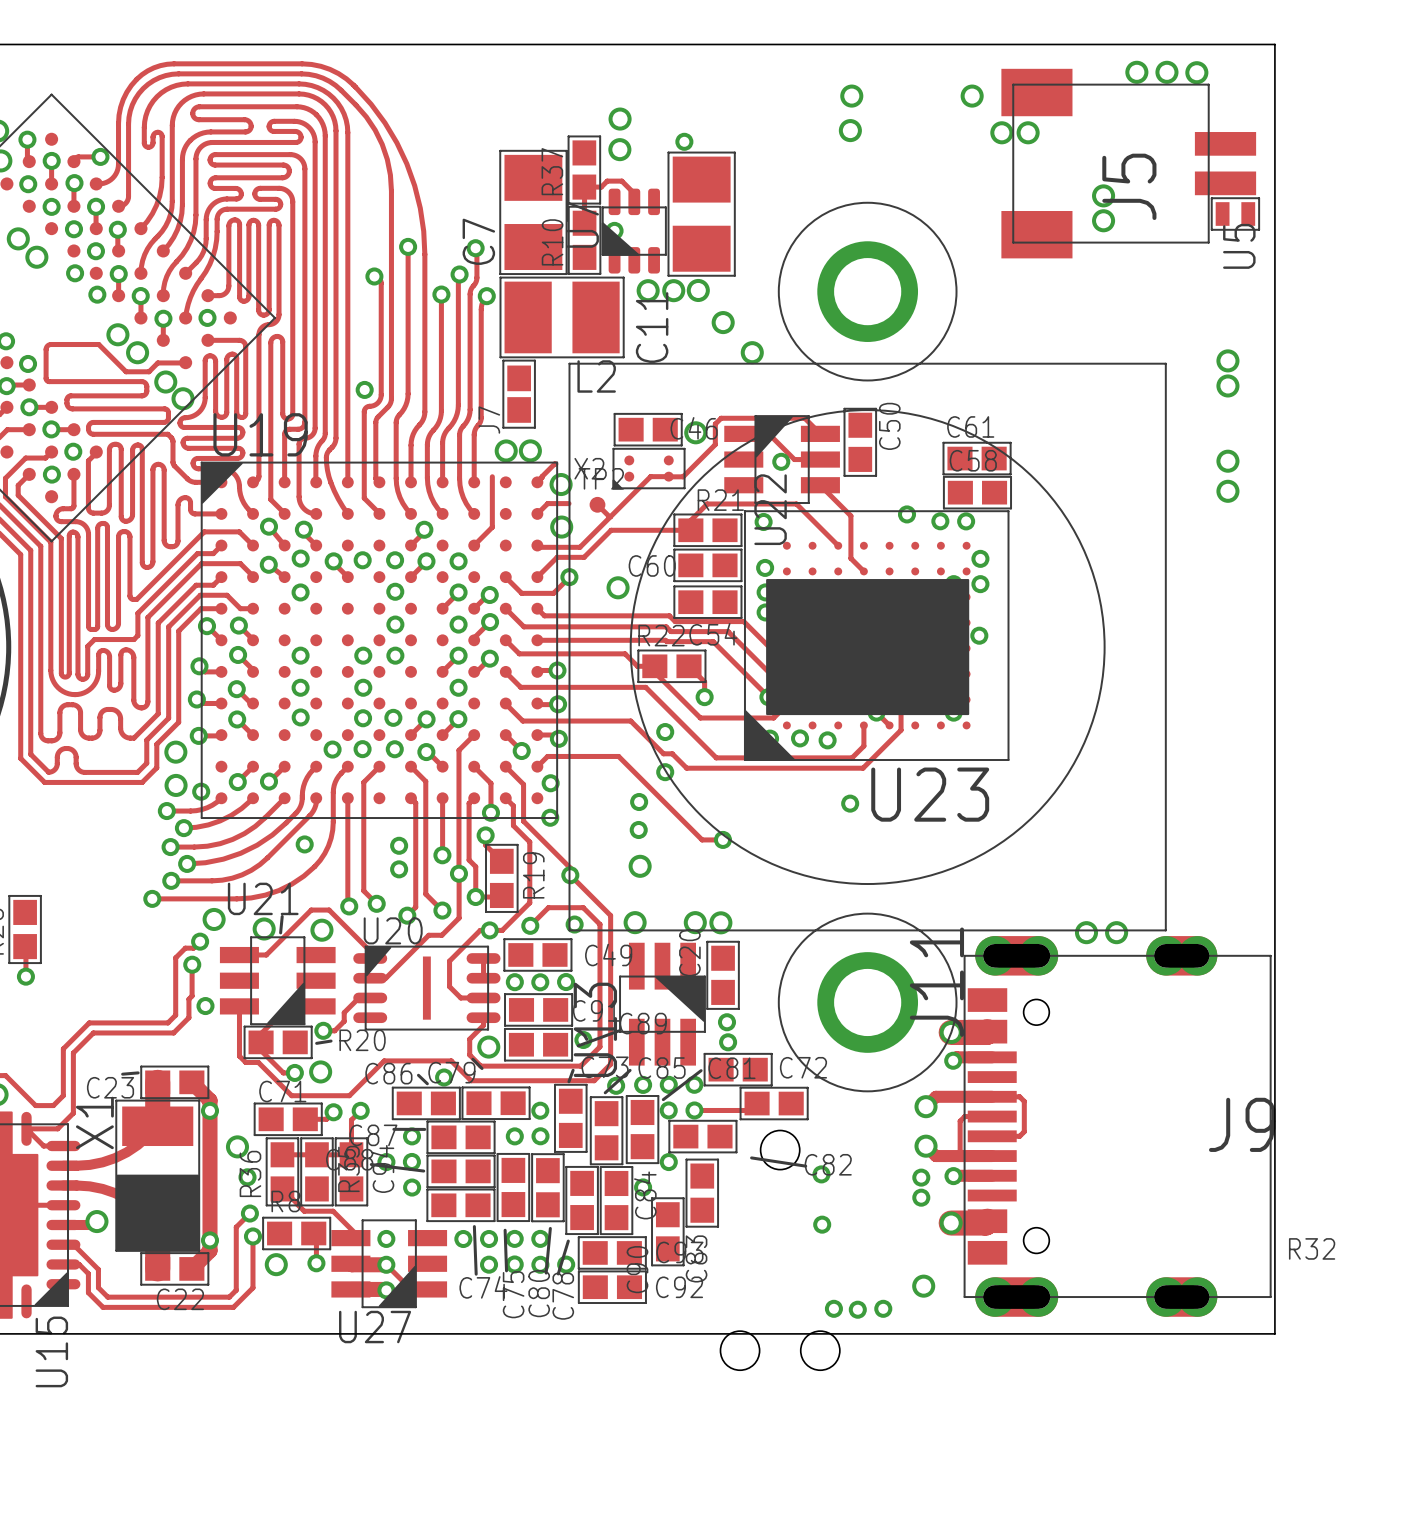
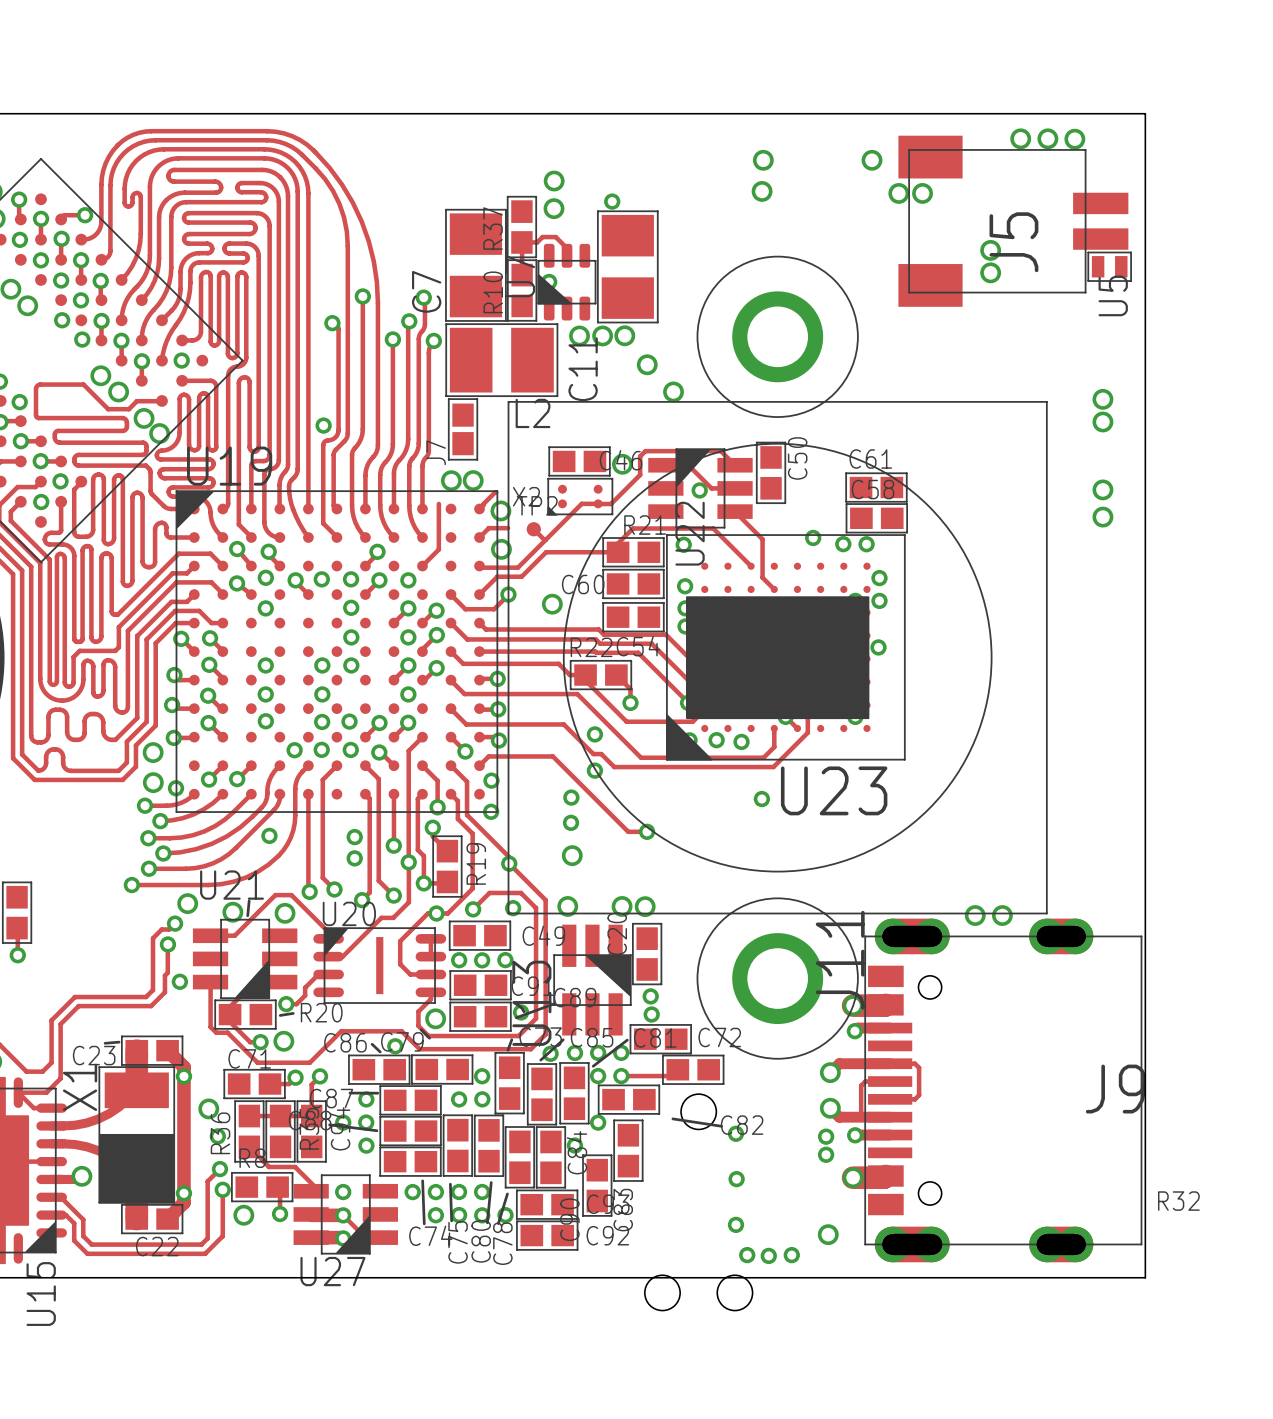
via: none -> (736, 1224)

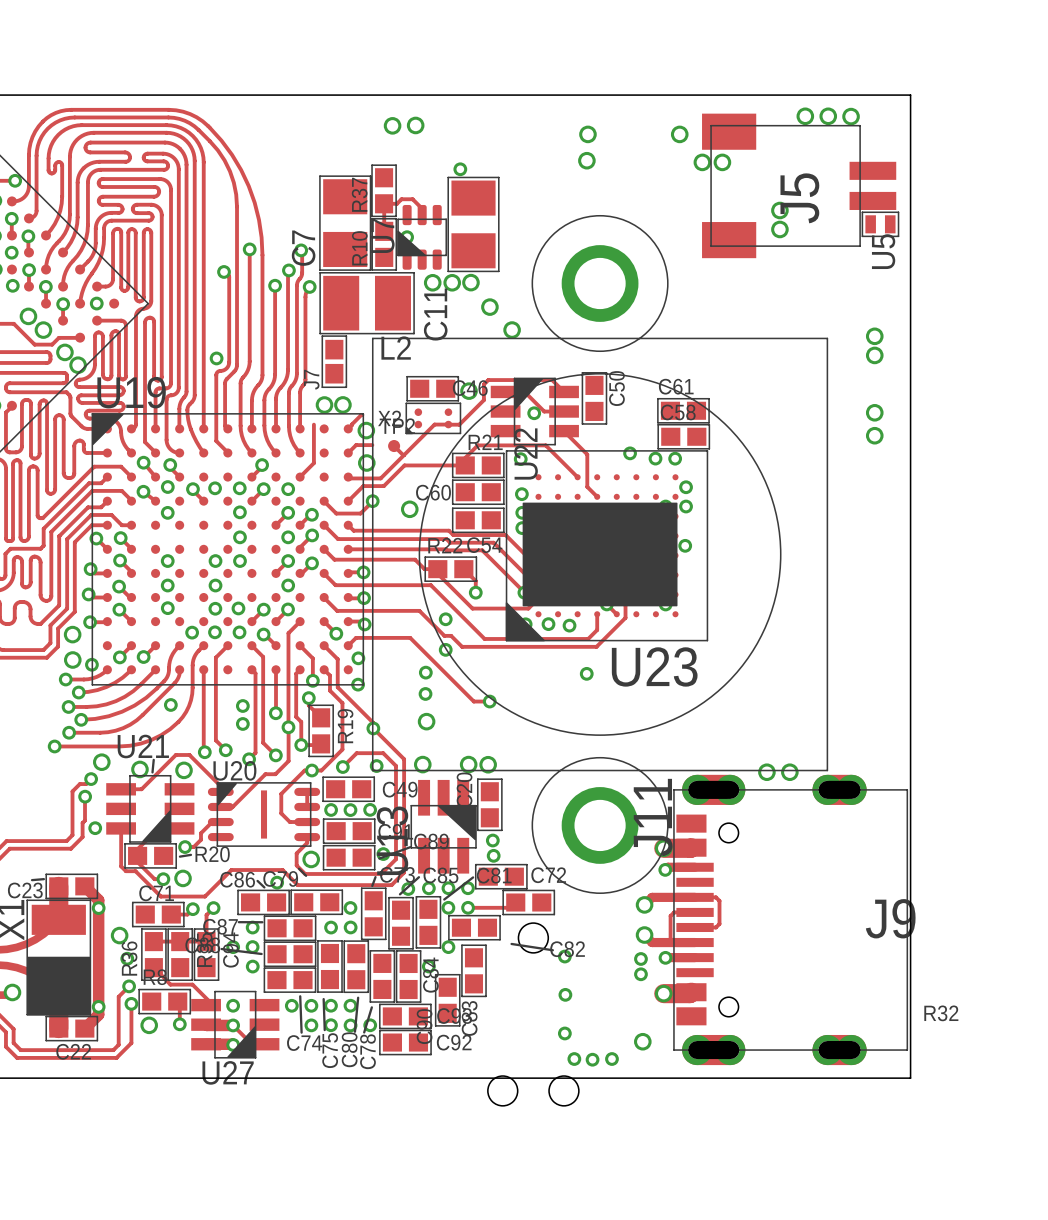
via: none -> (415, 125)
via: none -> (392, 125)
via: (554, 181) -> none
via: (553, 208) -> none

